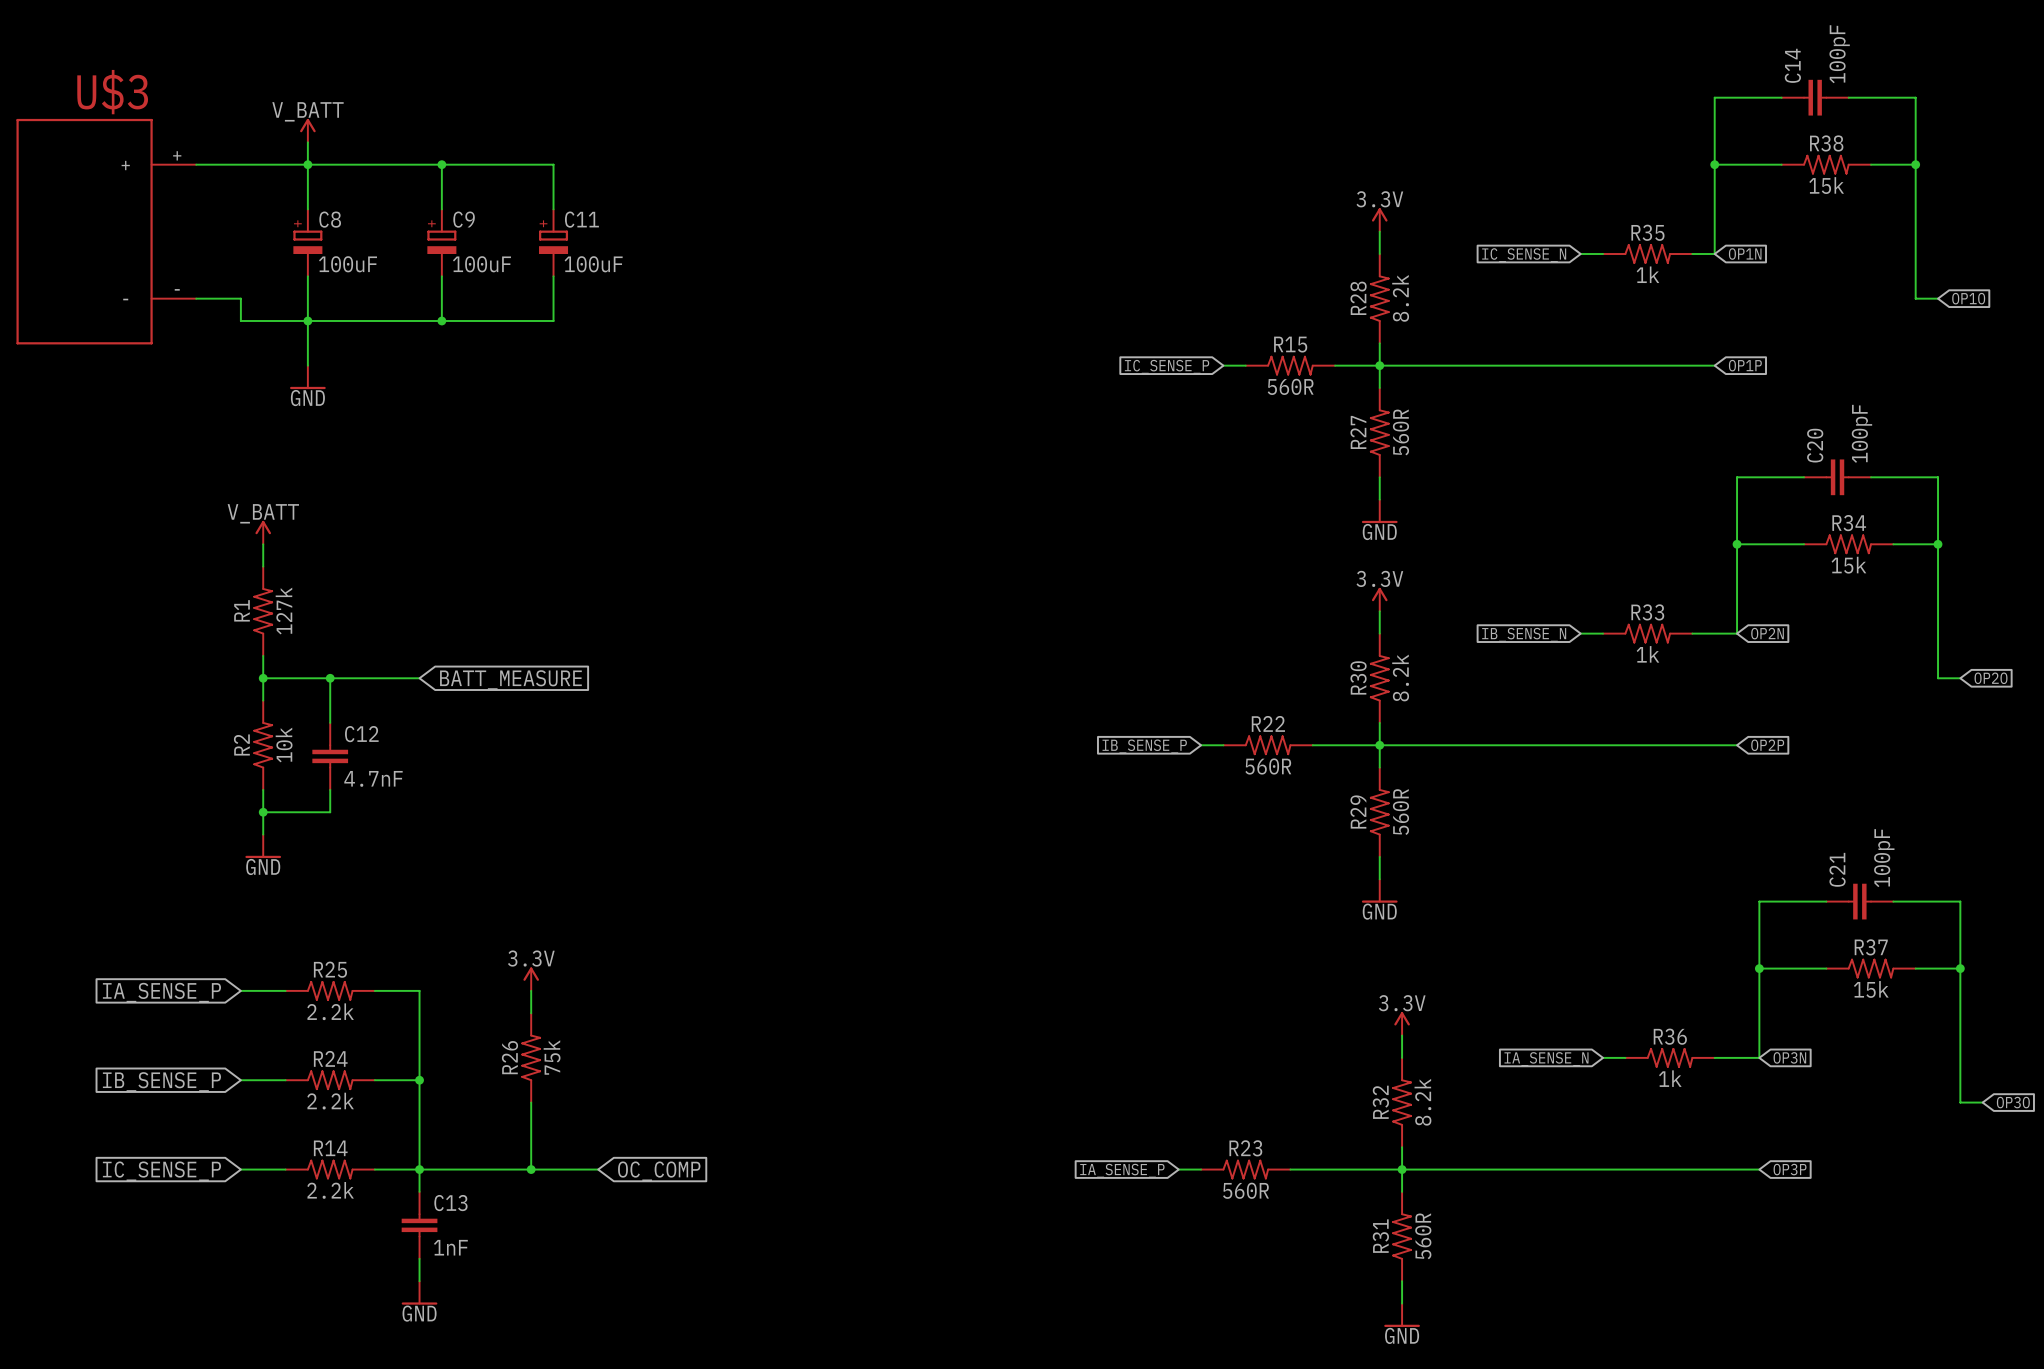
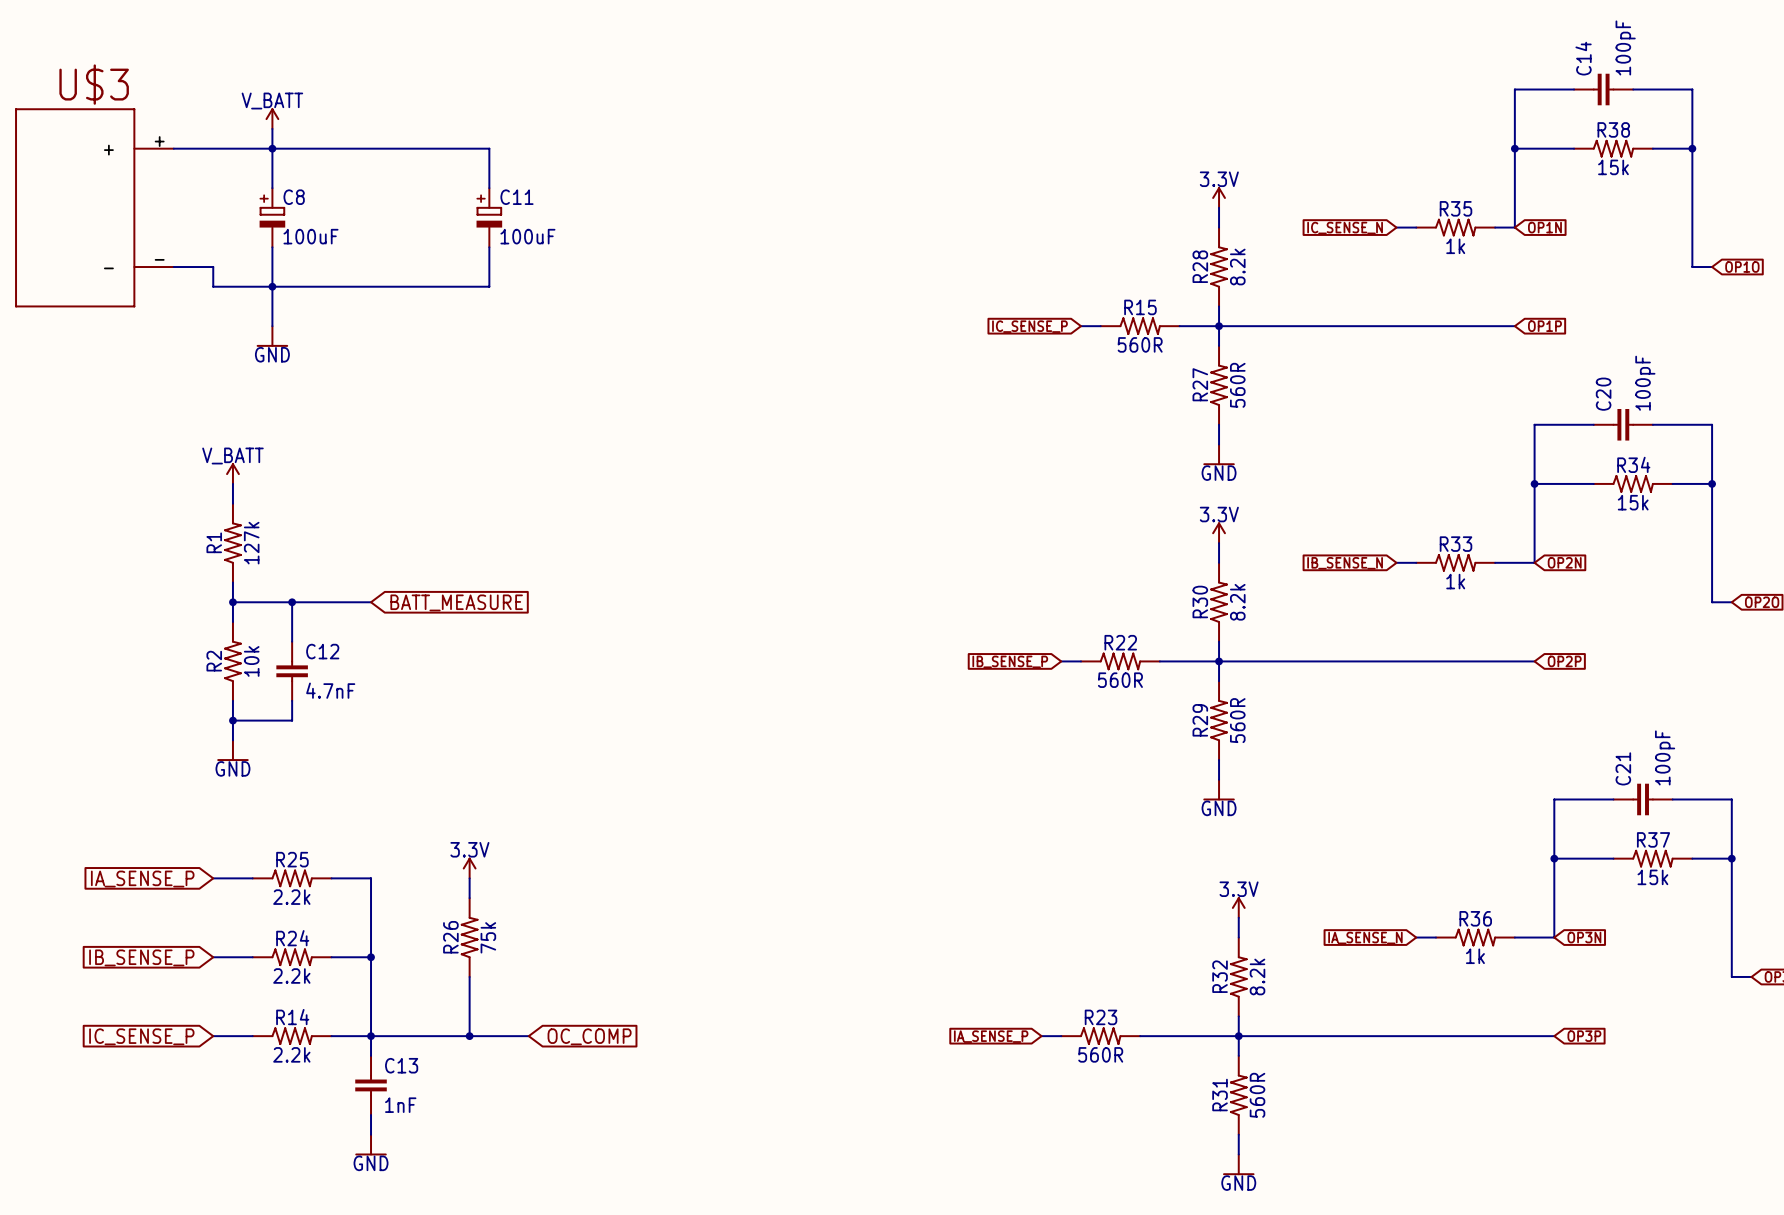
wire: (441, 164) (441, 209) -> none
junction: (441, 164) -> none
C9: 100uF (441, 242) -> none
wire: (441, 276) (441, 320) -> none
junction: (441, 320) -> none

